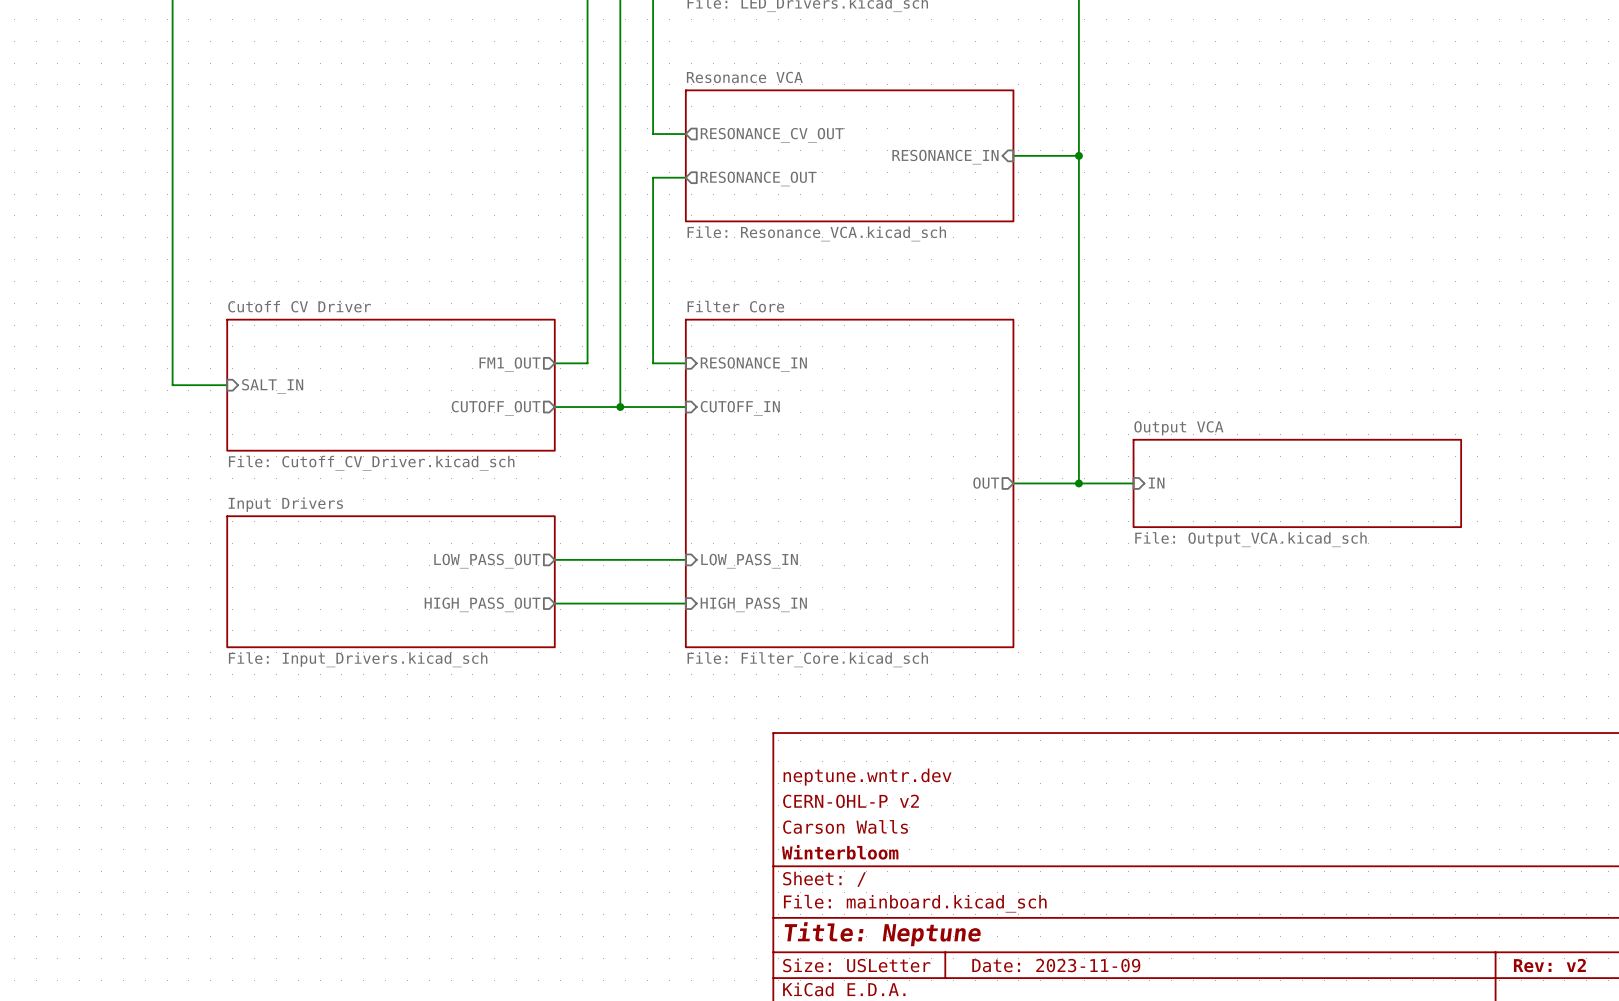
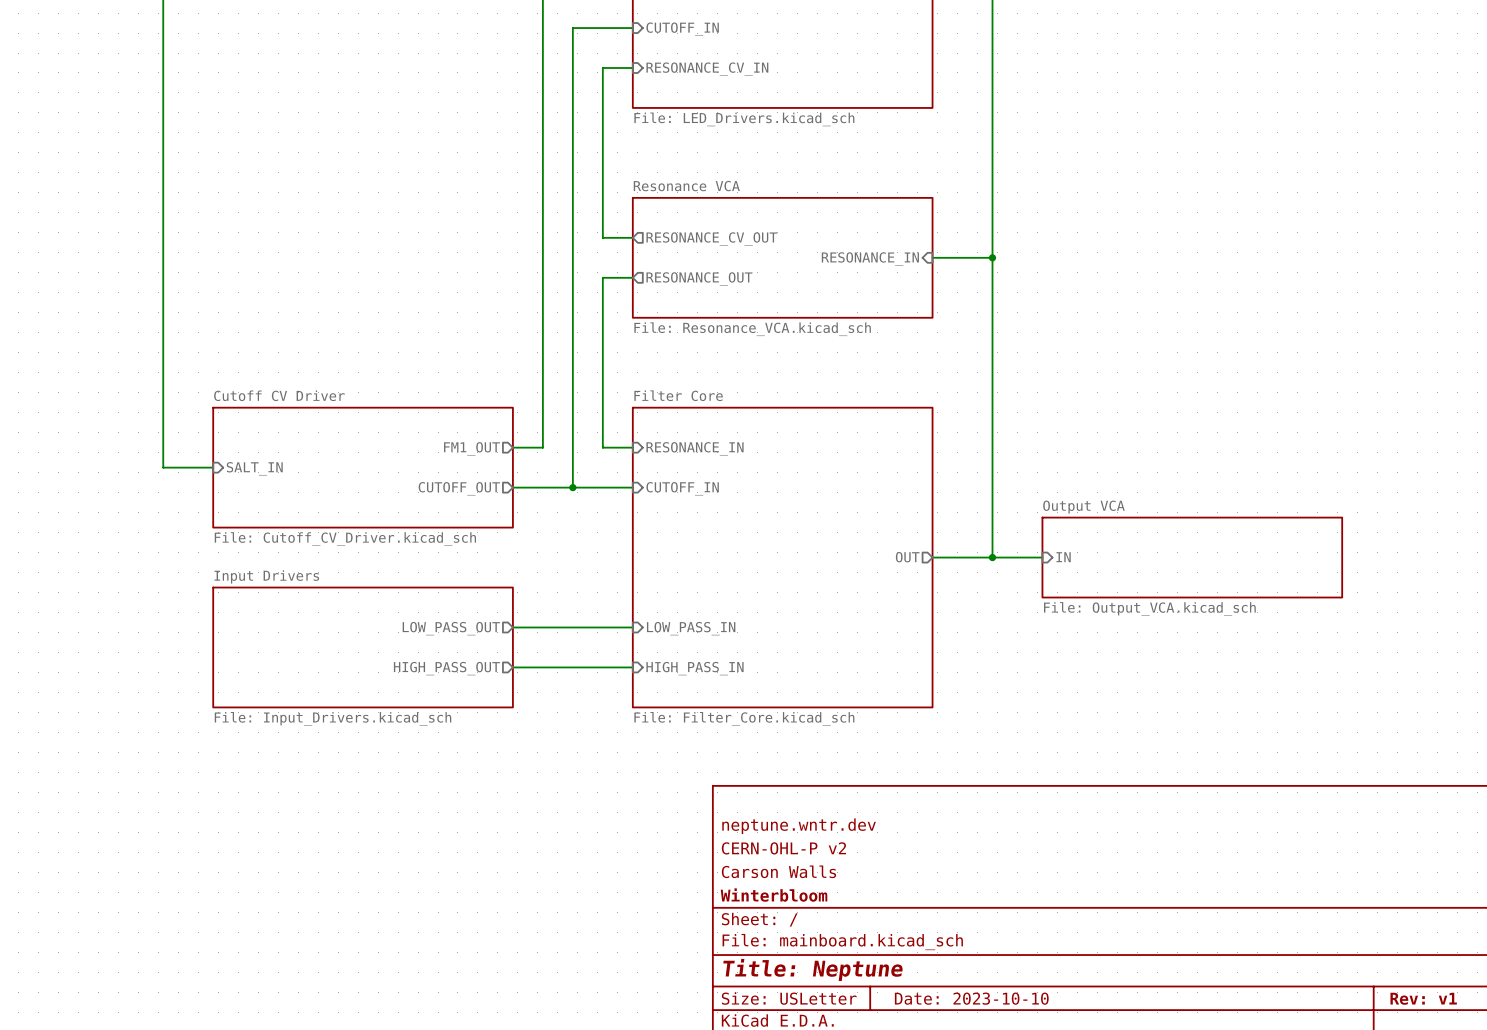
title block: Date: 2023-11-09 (1056, 965) -> Date: 2023-10-10 (971, 998)
title block: Rev: v2 (1549, 965) -> Rev: v1 (1423, 998)

